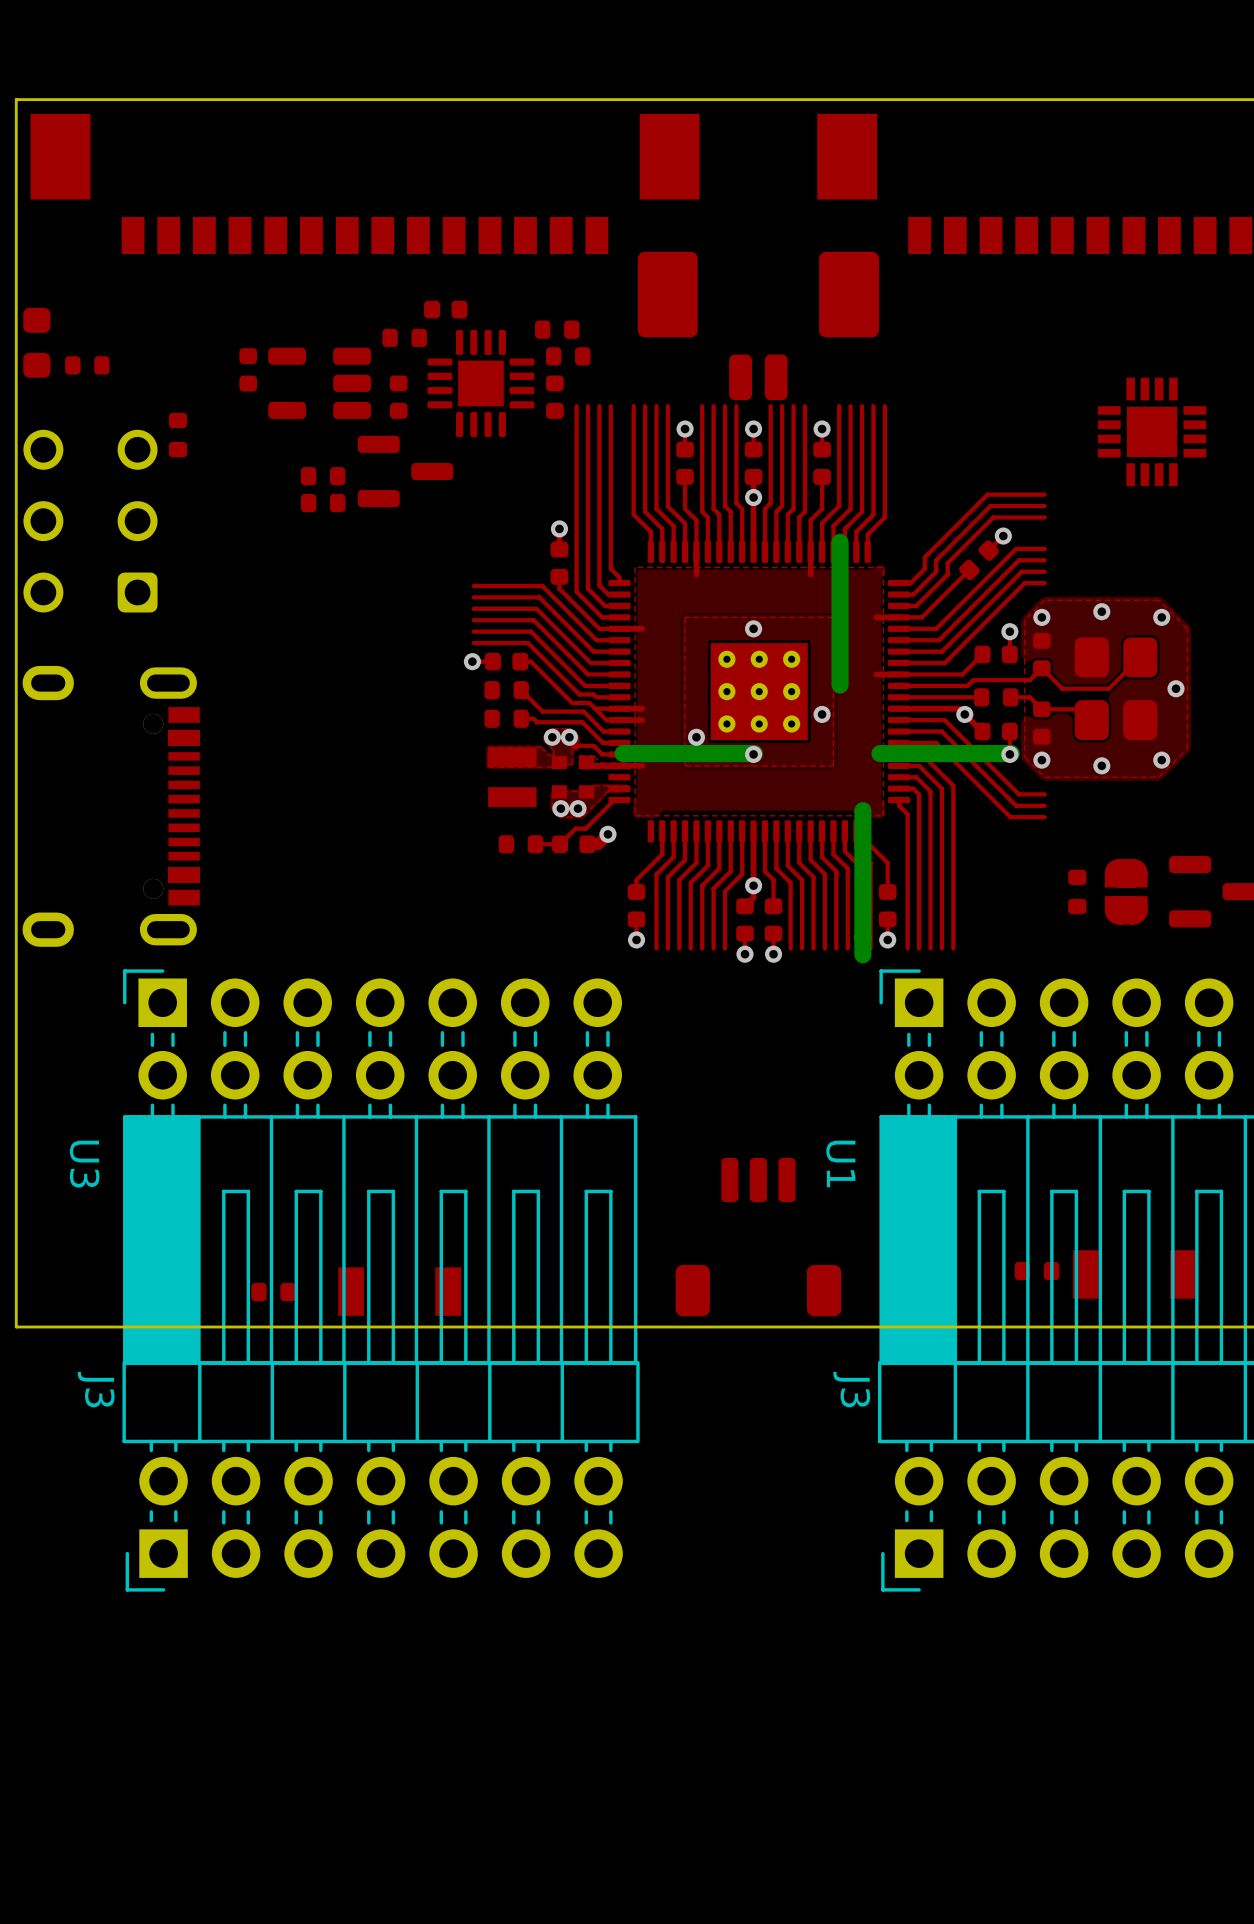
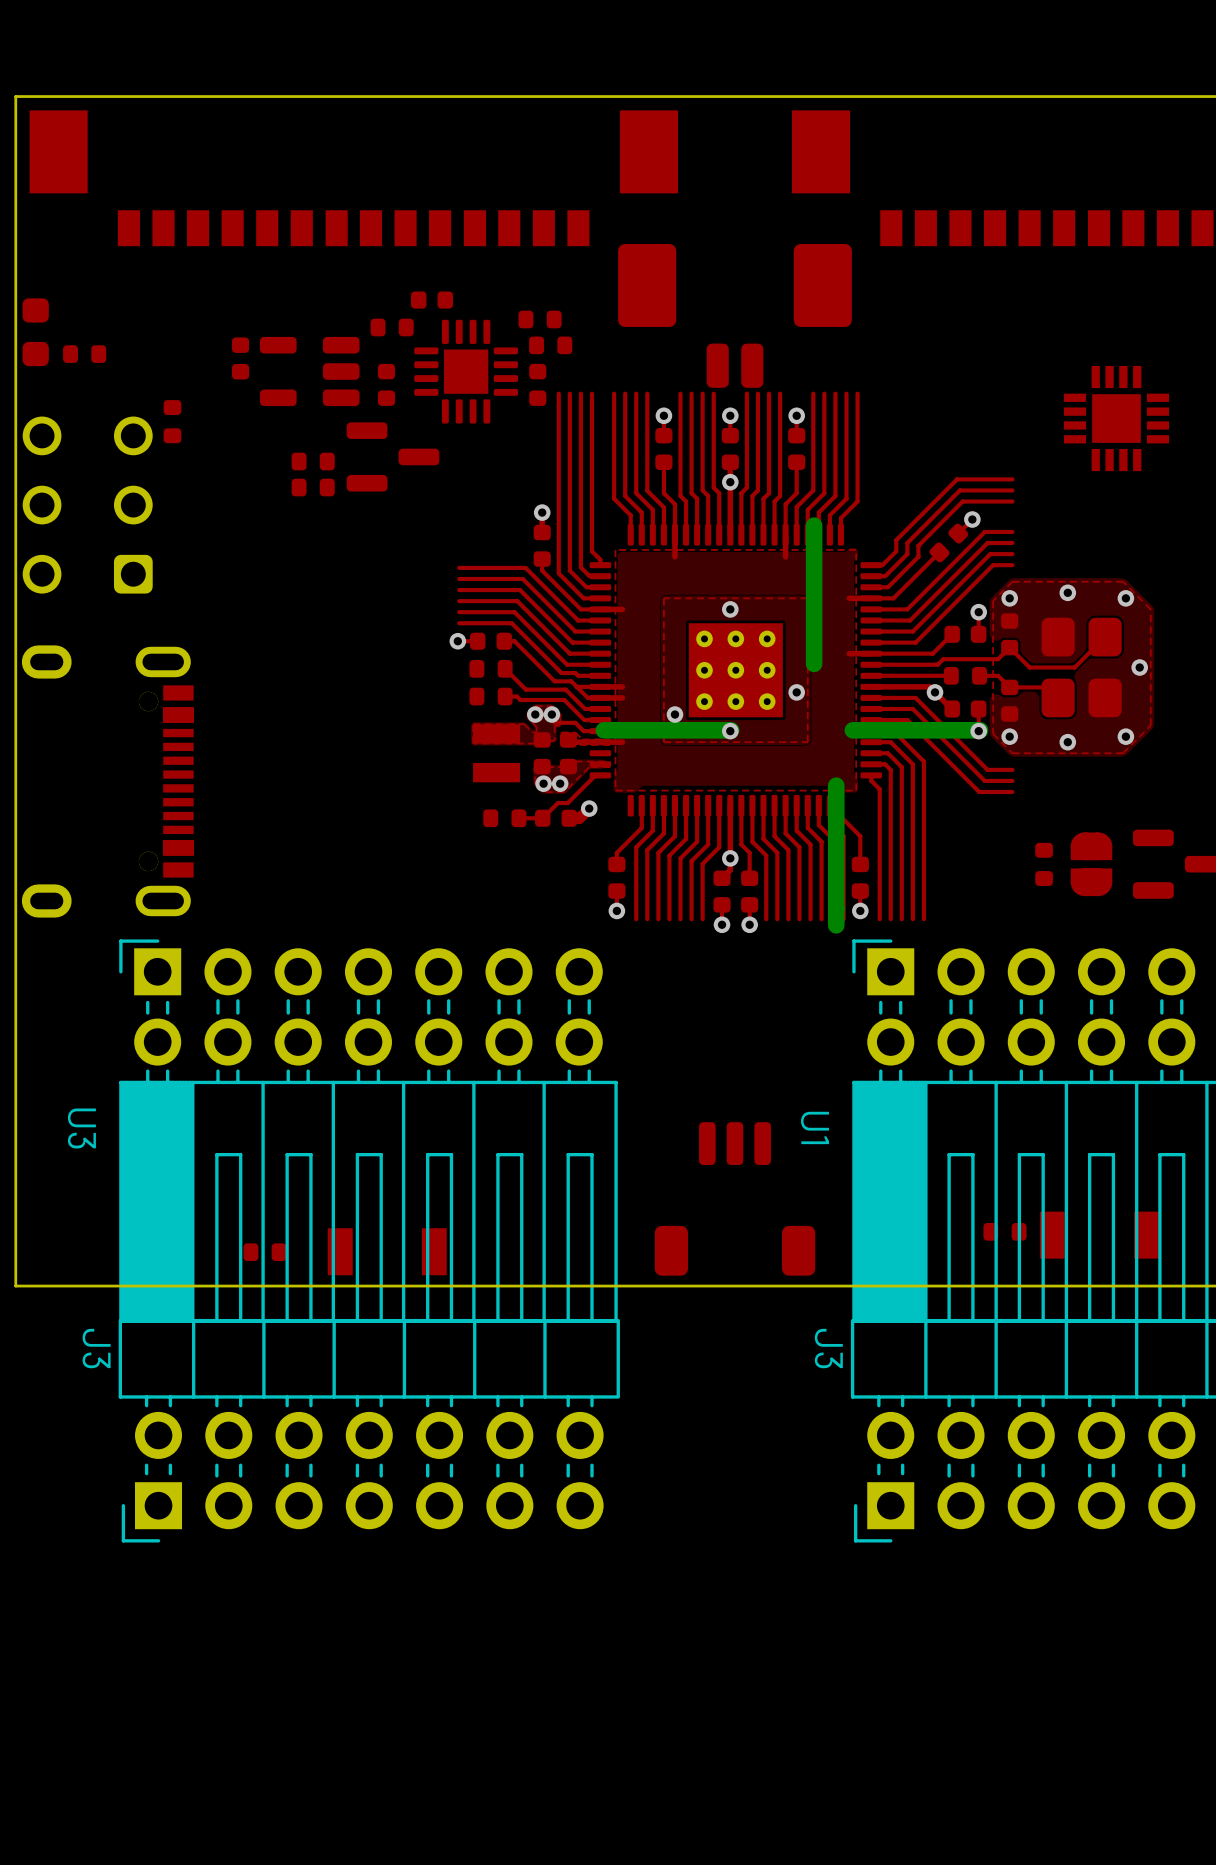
part footprint: [551, 755, 568, 799] -> [533, 732, 551, 775]
part footprint: [579, 755, 595, 799] -> [559, 732, 578, 775]

